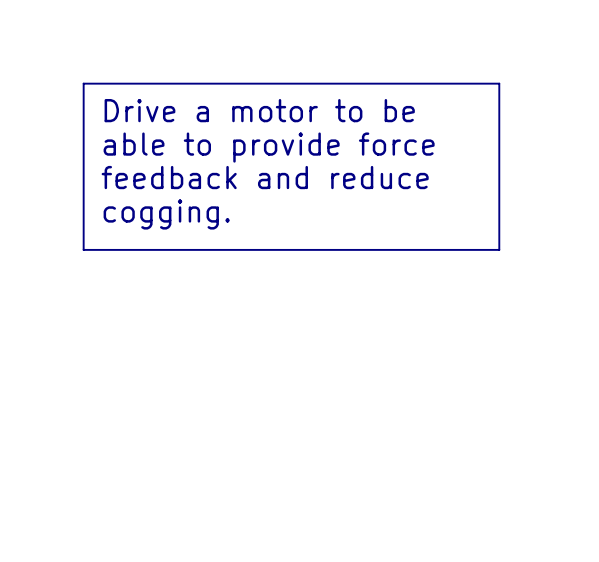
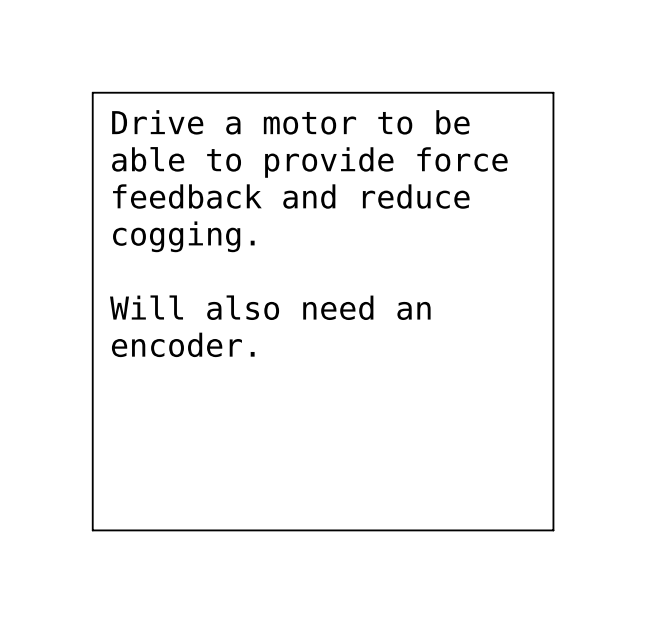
line: (83, 249) (499, 249) -> (92, 277) (92, 530) (553, 530) (553, 277)
text: none -> Will also need an (270, 307)
text: none -> encoder. (183, 344)

